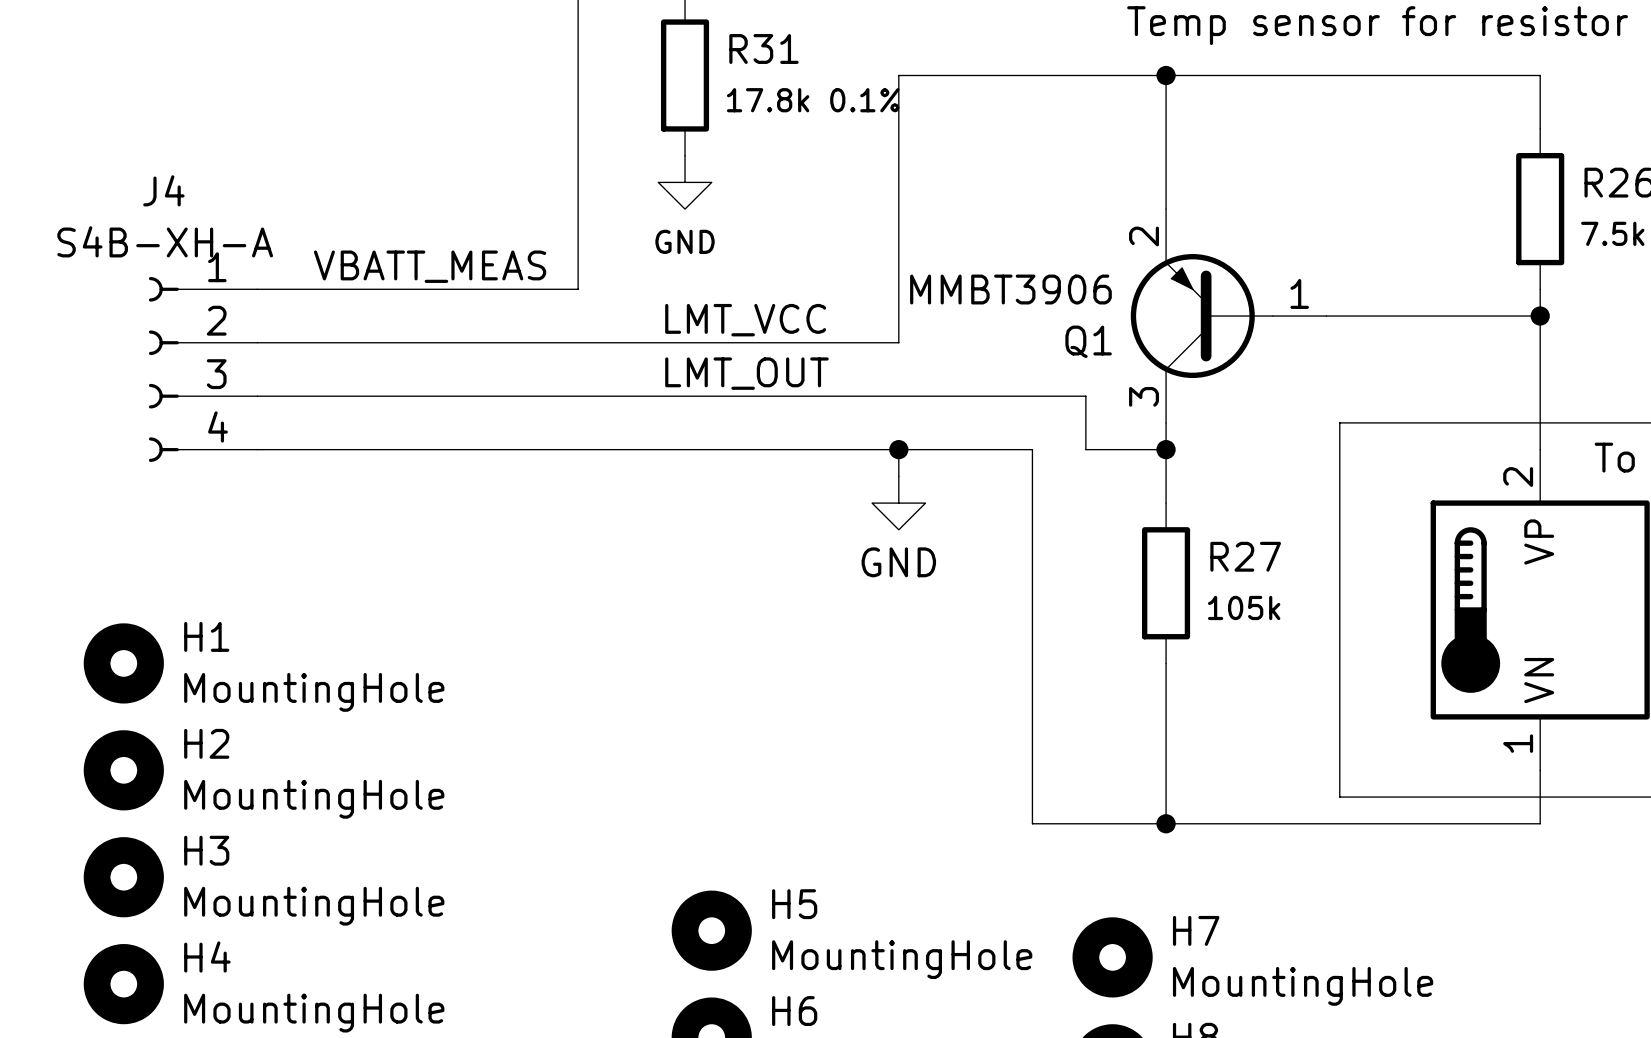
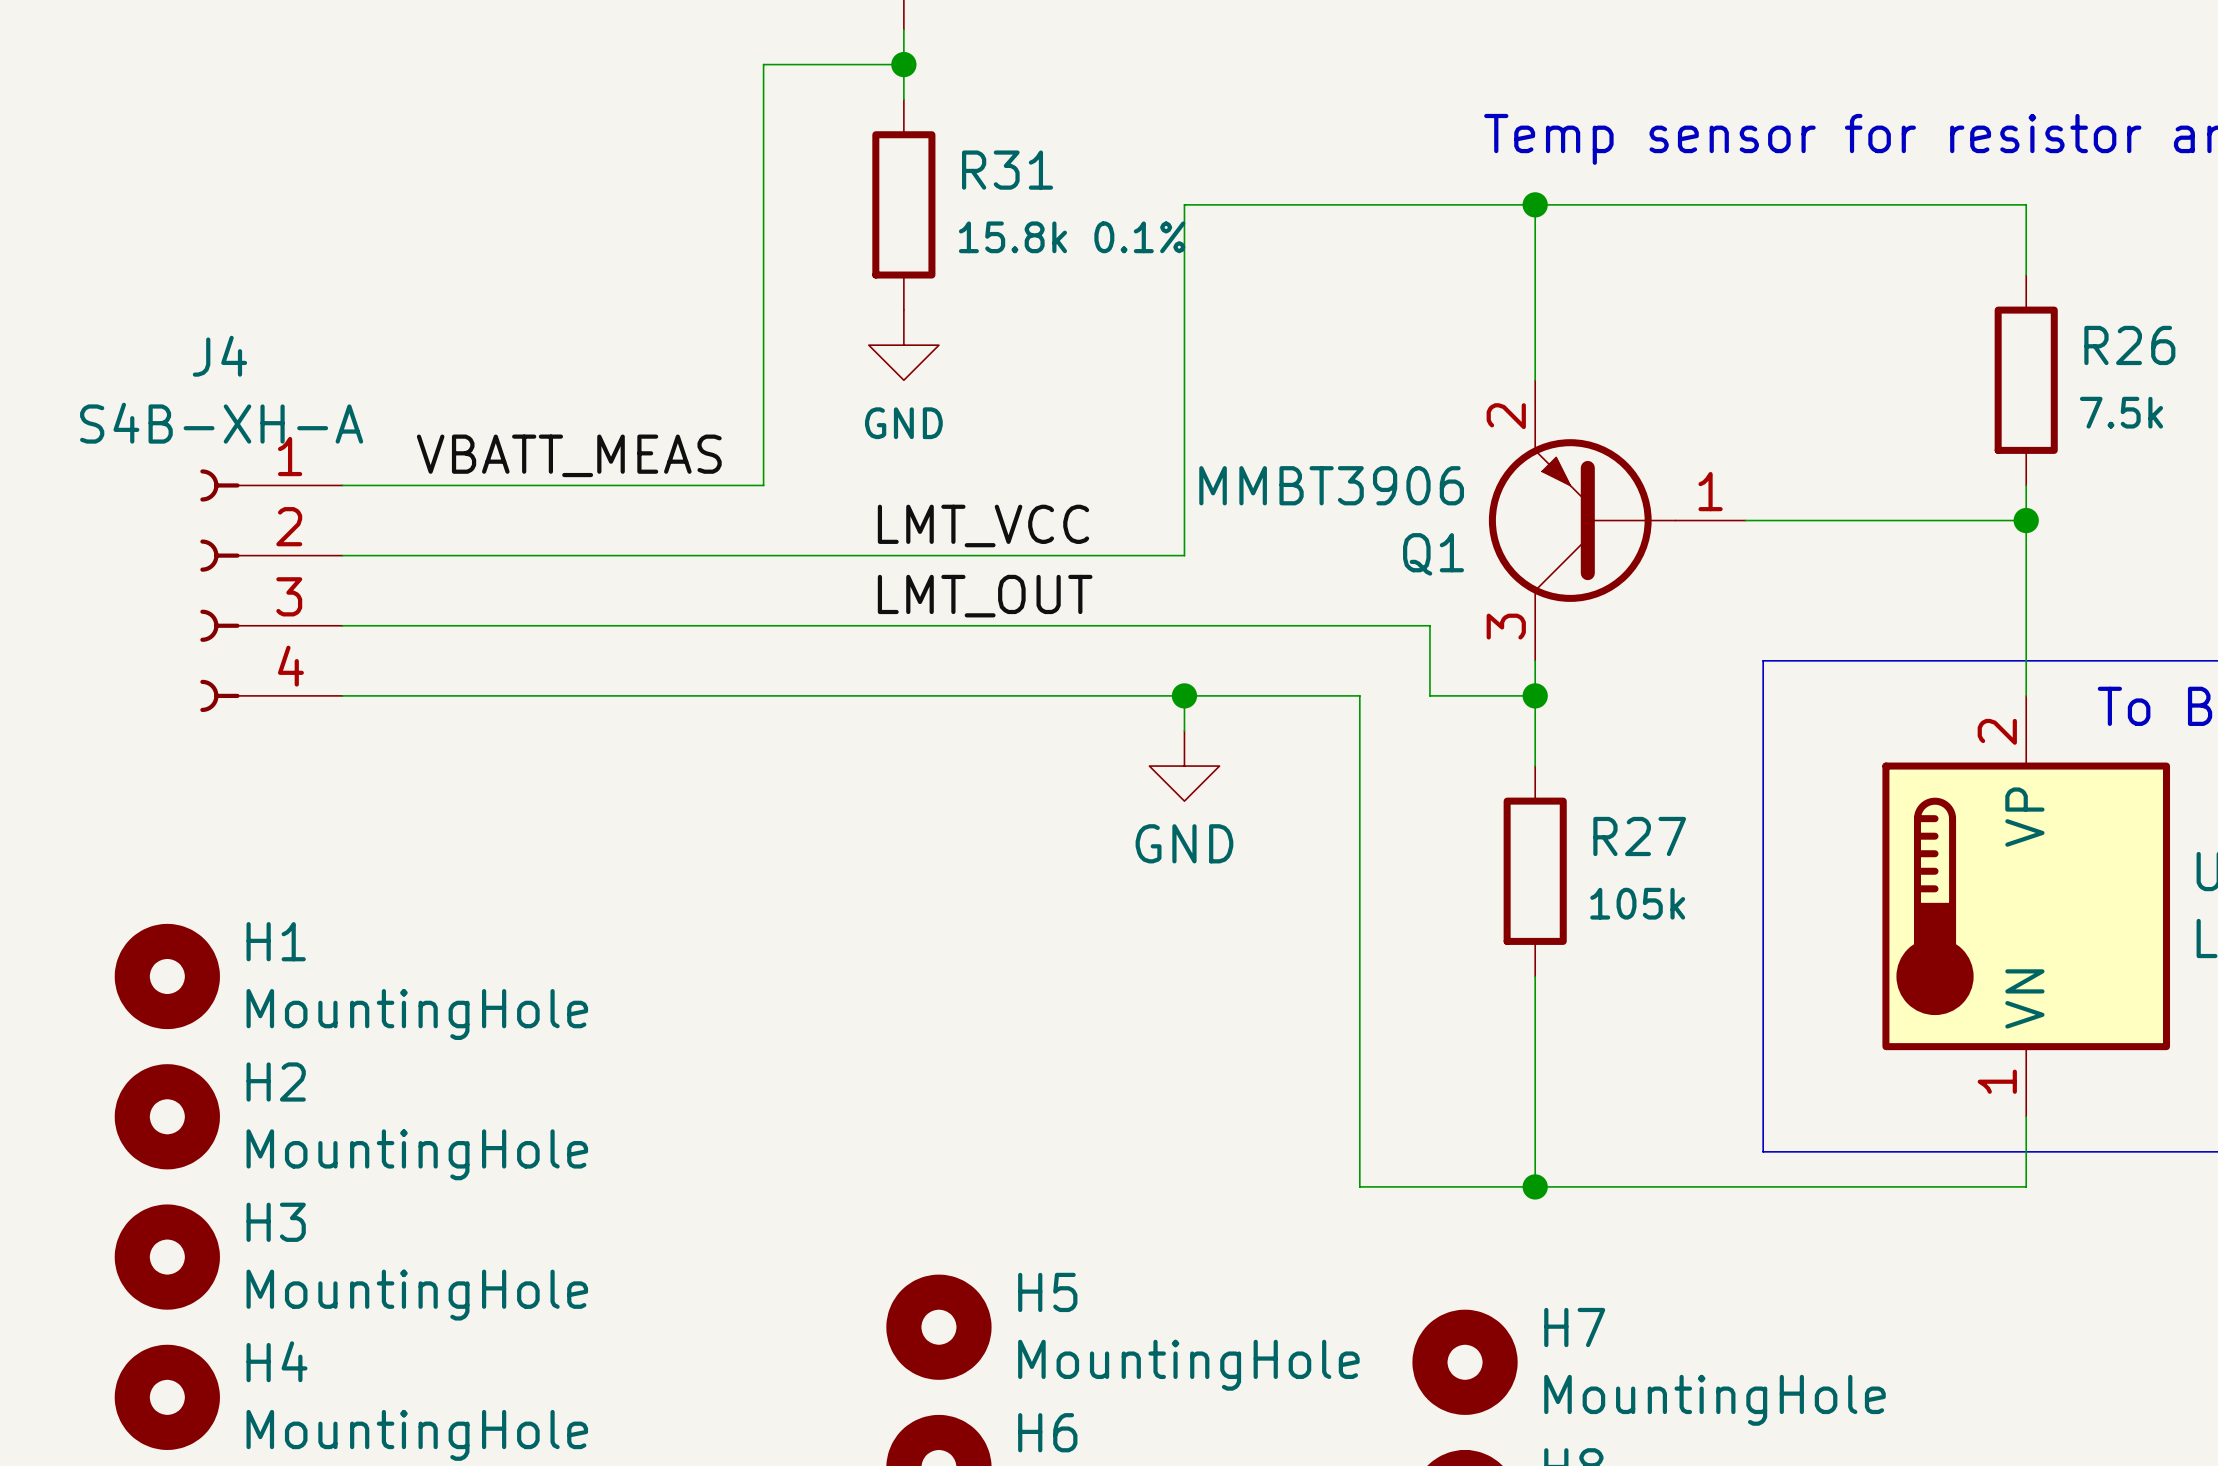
R31 value: 17.8k 0.1% (813, 100) -> 15.8k 0.1% (1072, 237)

